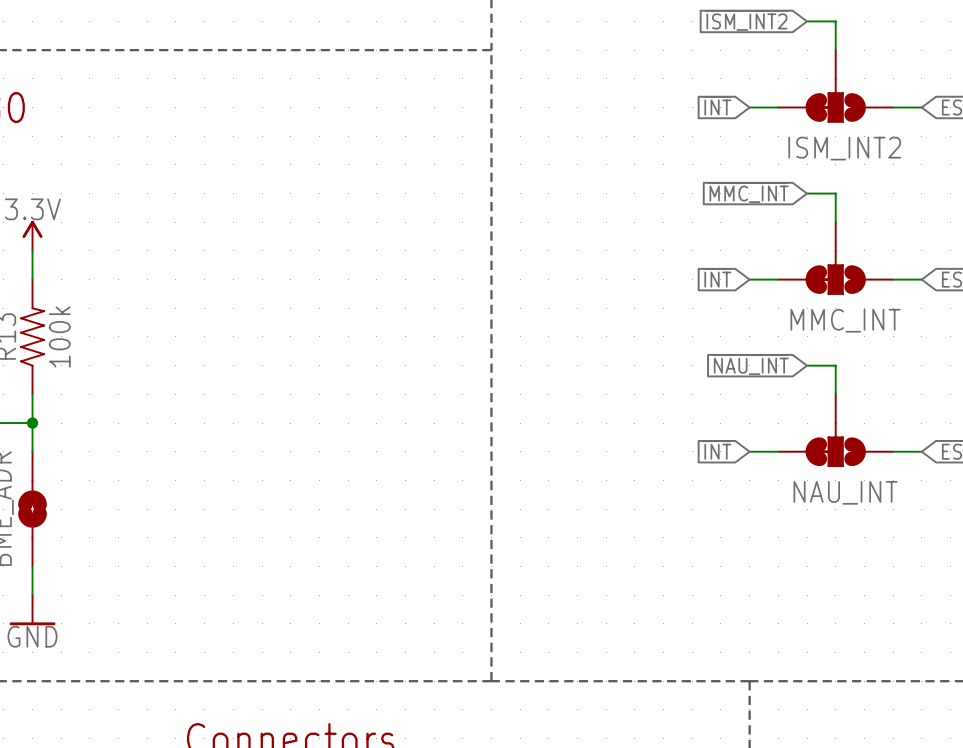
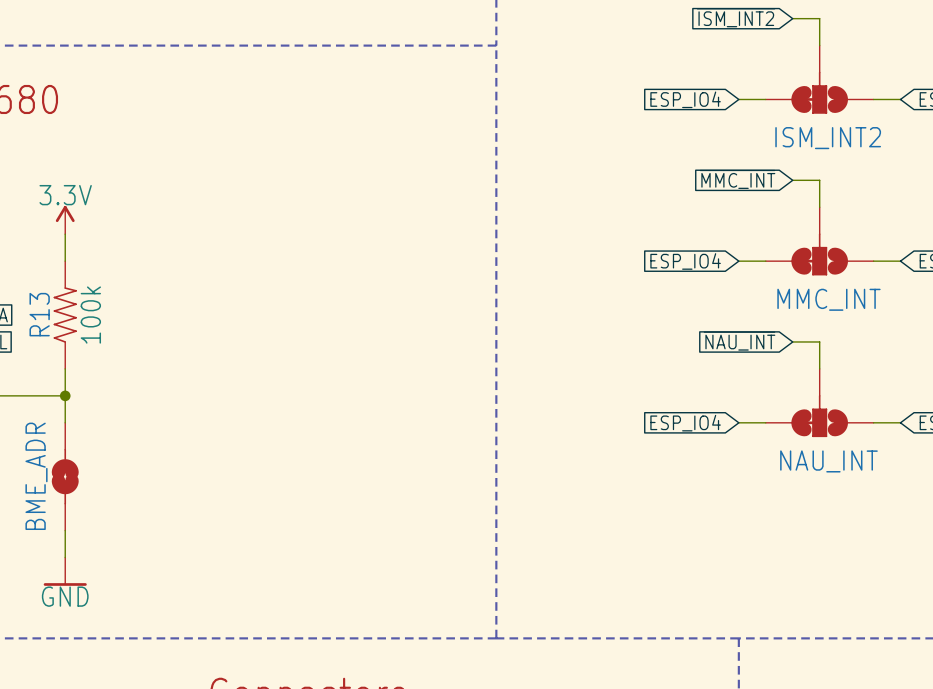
global label: ~{INT} (716, 105) -> ESP_IO4 (685, 99)
global label: ~{INT} (716, 277) -> ESP_IO4 (685, 261)
global label: ~{INT} (716, 450) -> ESP_IO4 (685, 423)

